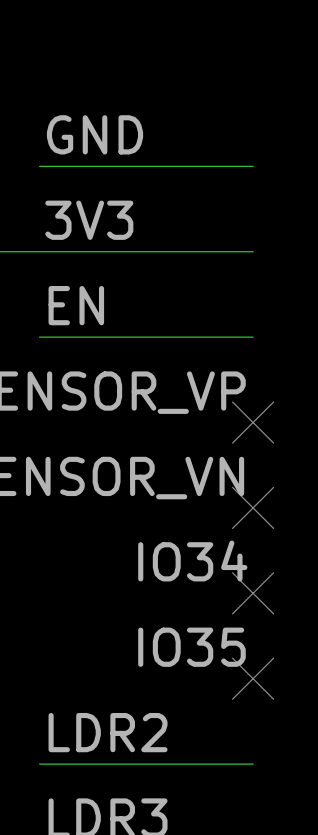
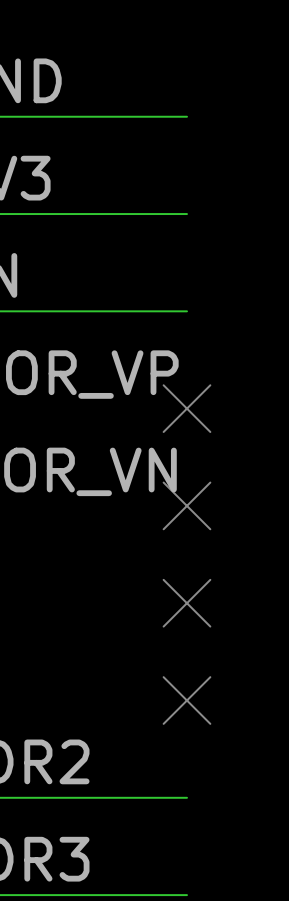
label: IO34 (192, 561) -> none
label: IO35 (191, 647) -> none

